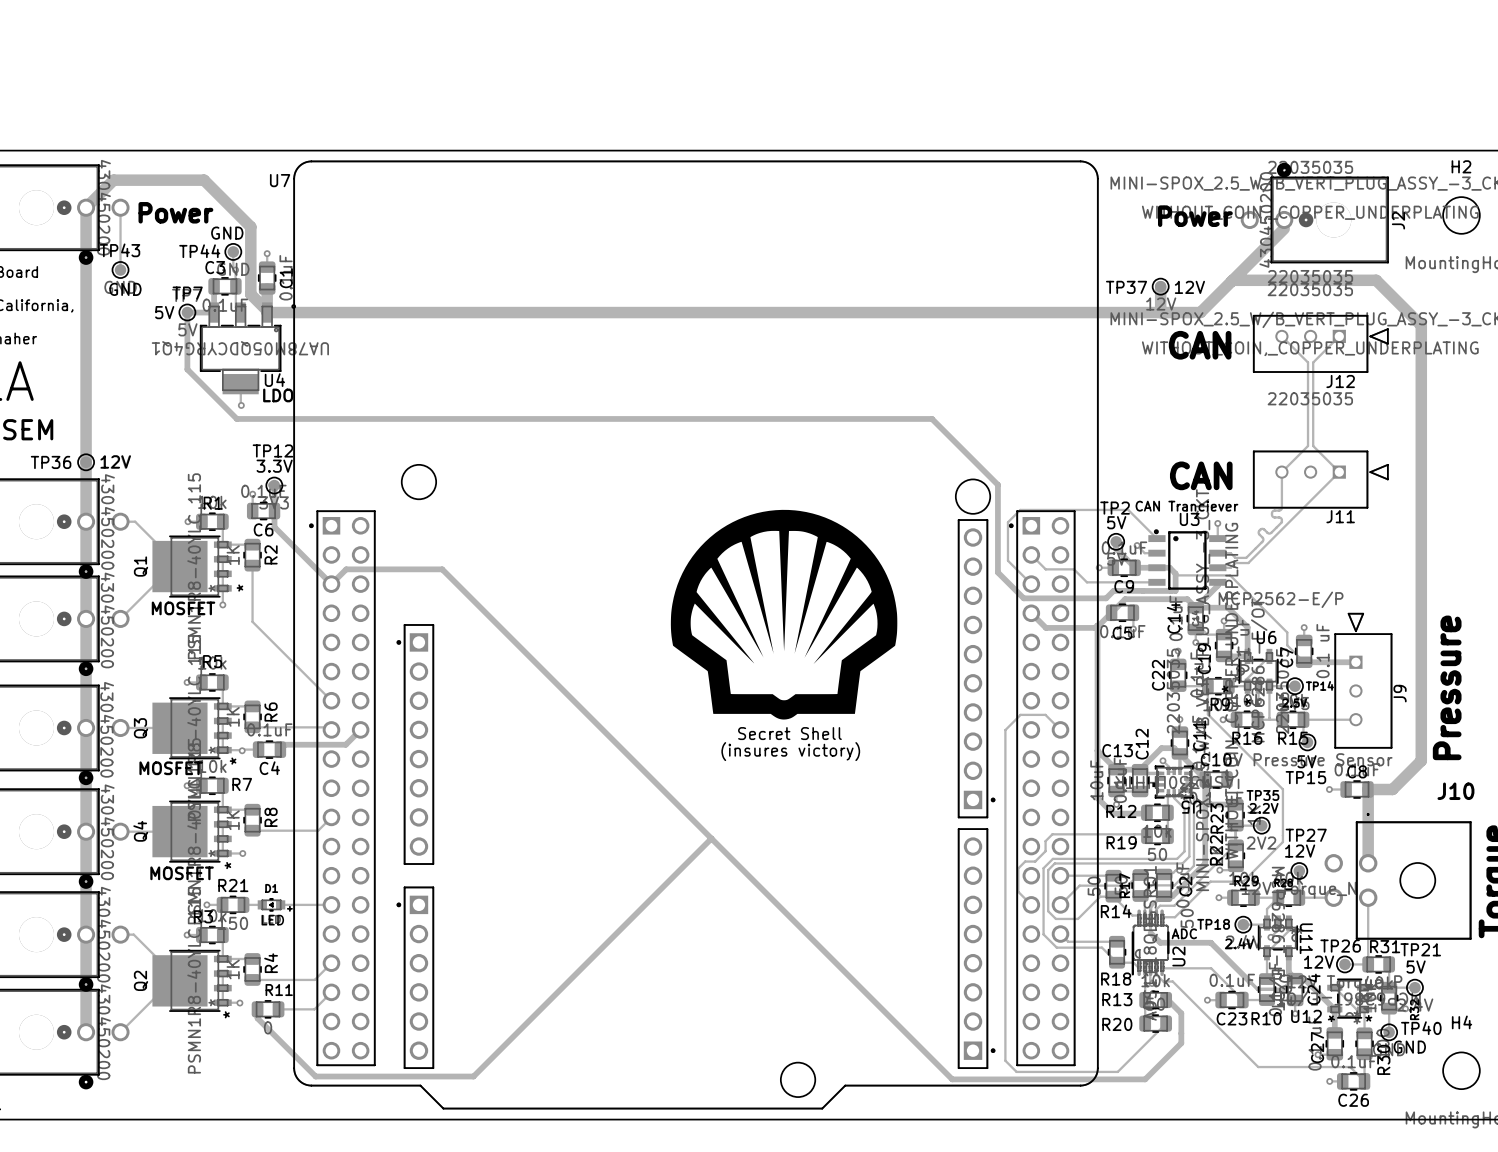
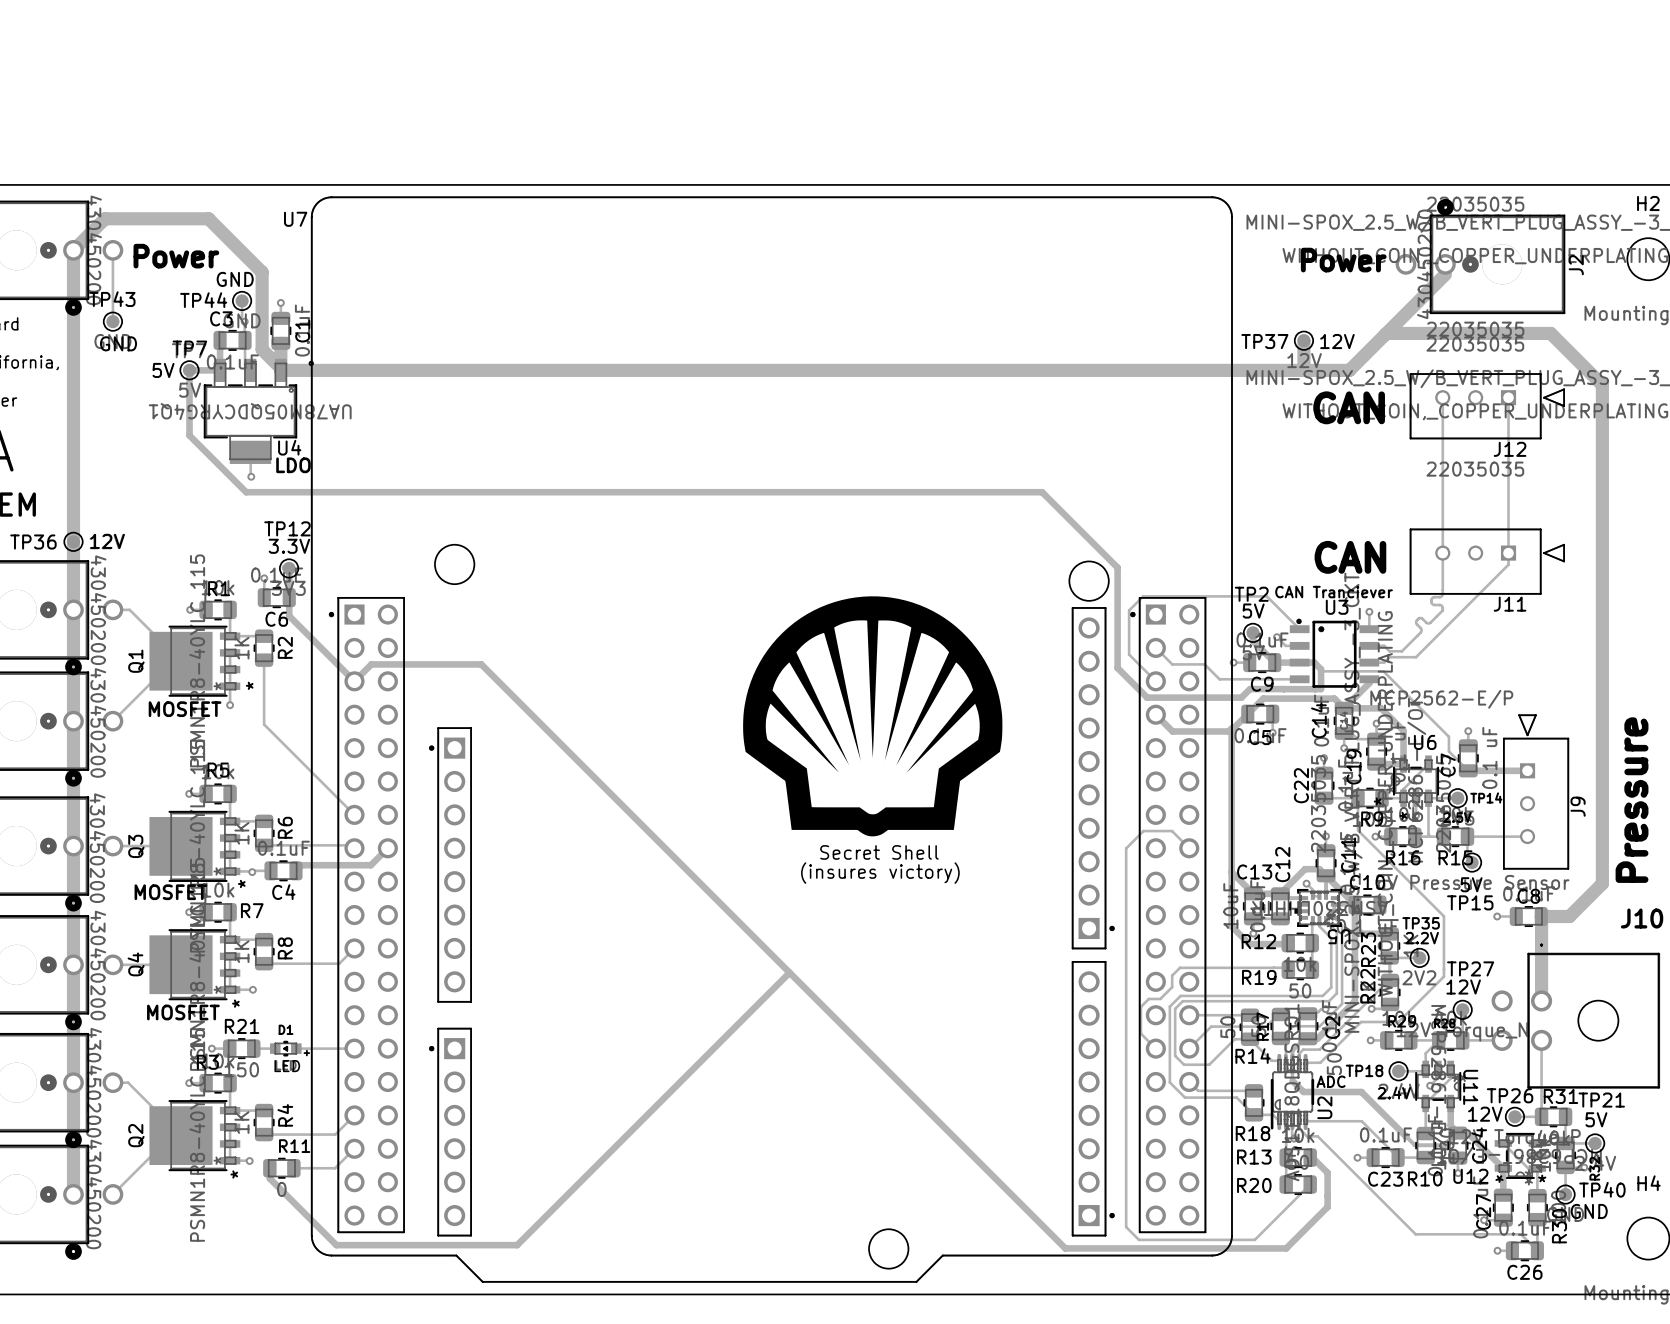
track: (1281, 336) (1308, 362) (1308, 446) (1281, 472) -> (1442, 397) (1442, 553)
track: (1339, 336) (1313, 362) (1313, 446) (1339, 472) -> (1508, 397) (1508, 564) (1416, 657) (1404, 657)
track: (1339, 472) (1248, 563) -> none

